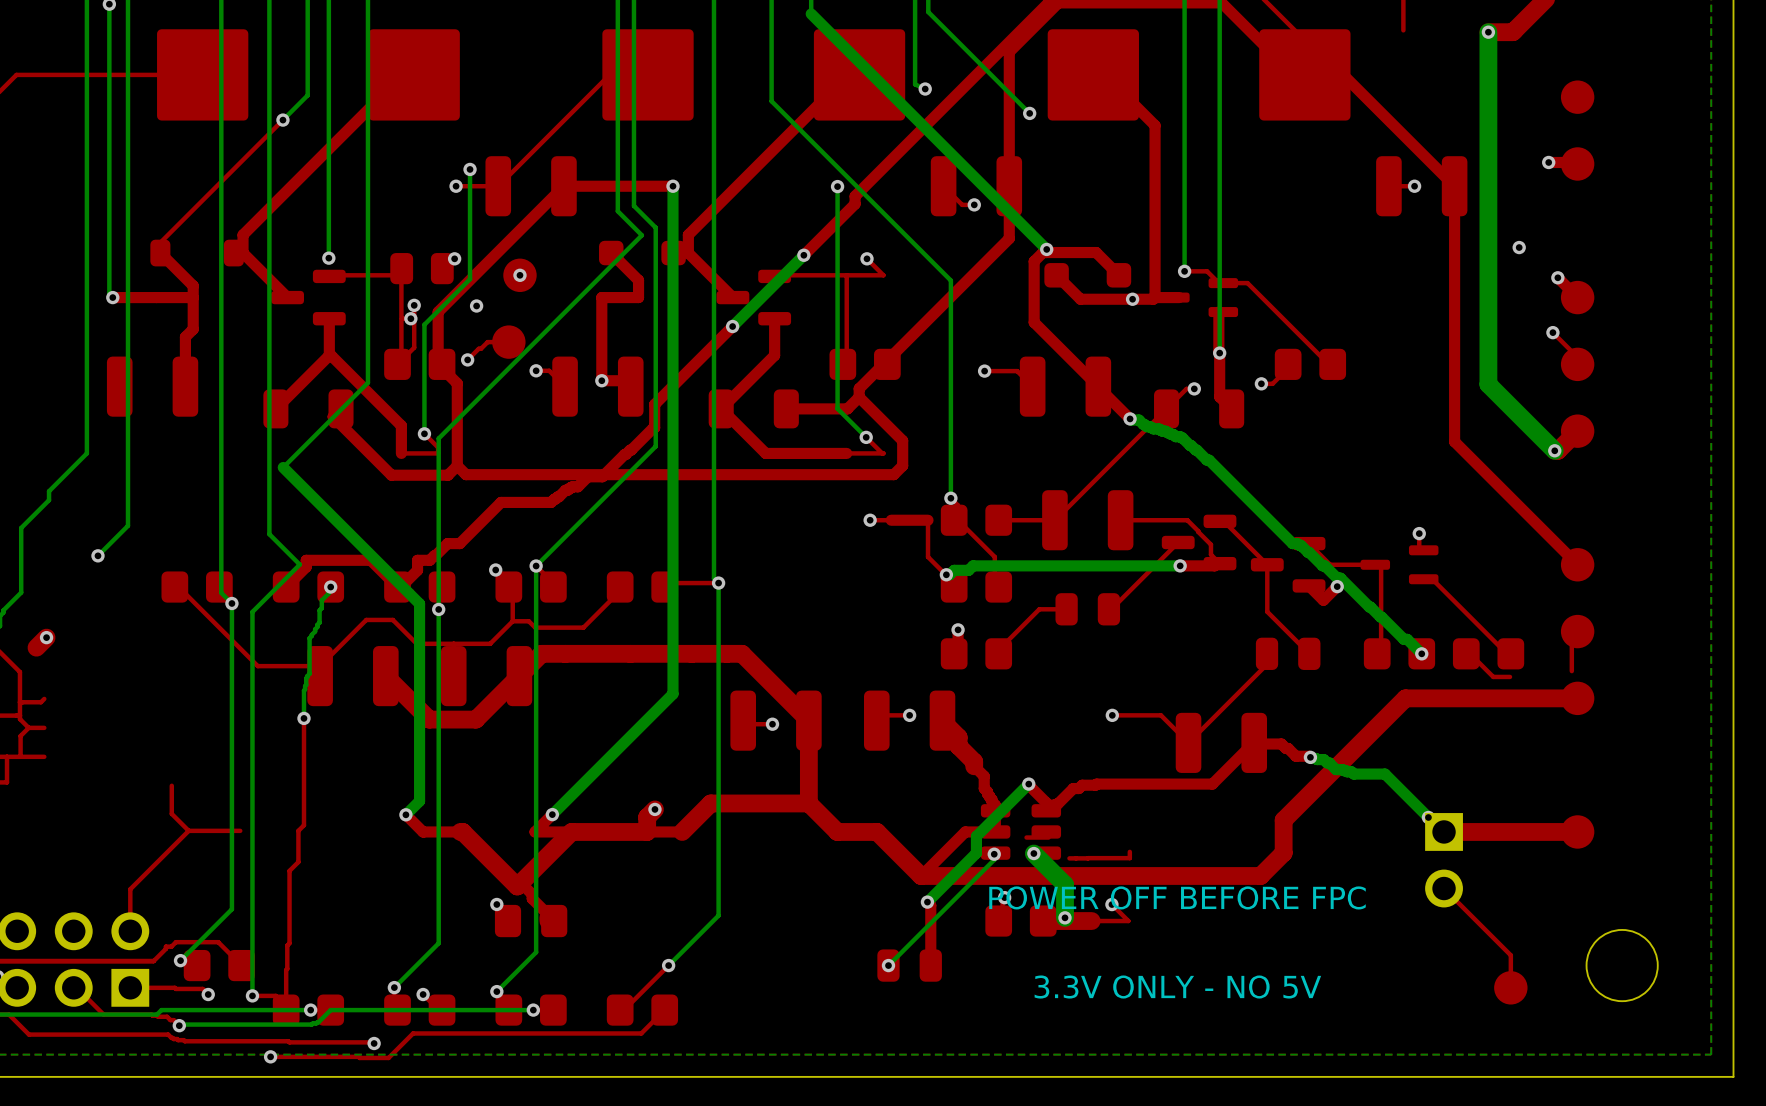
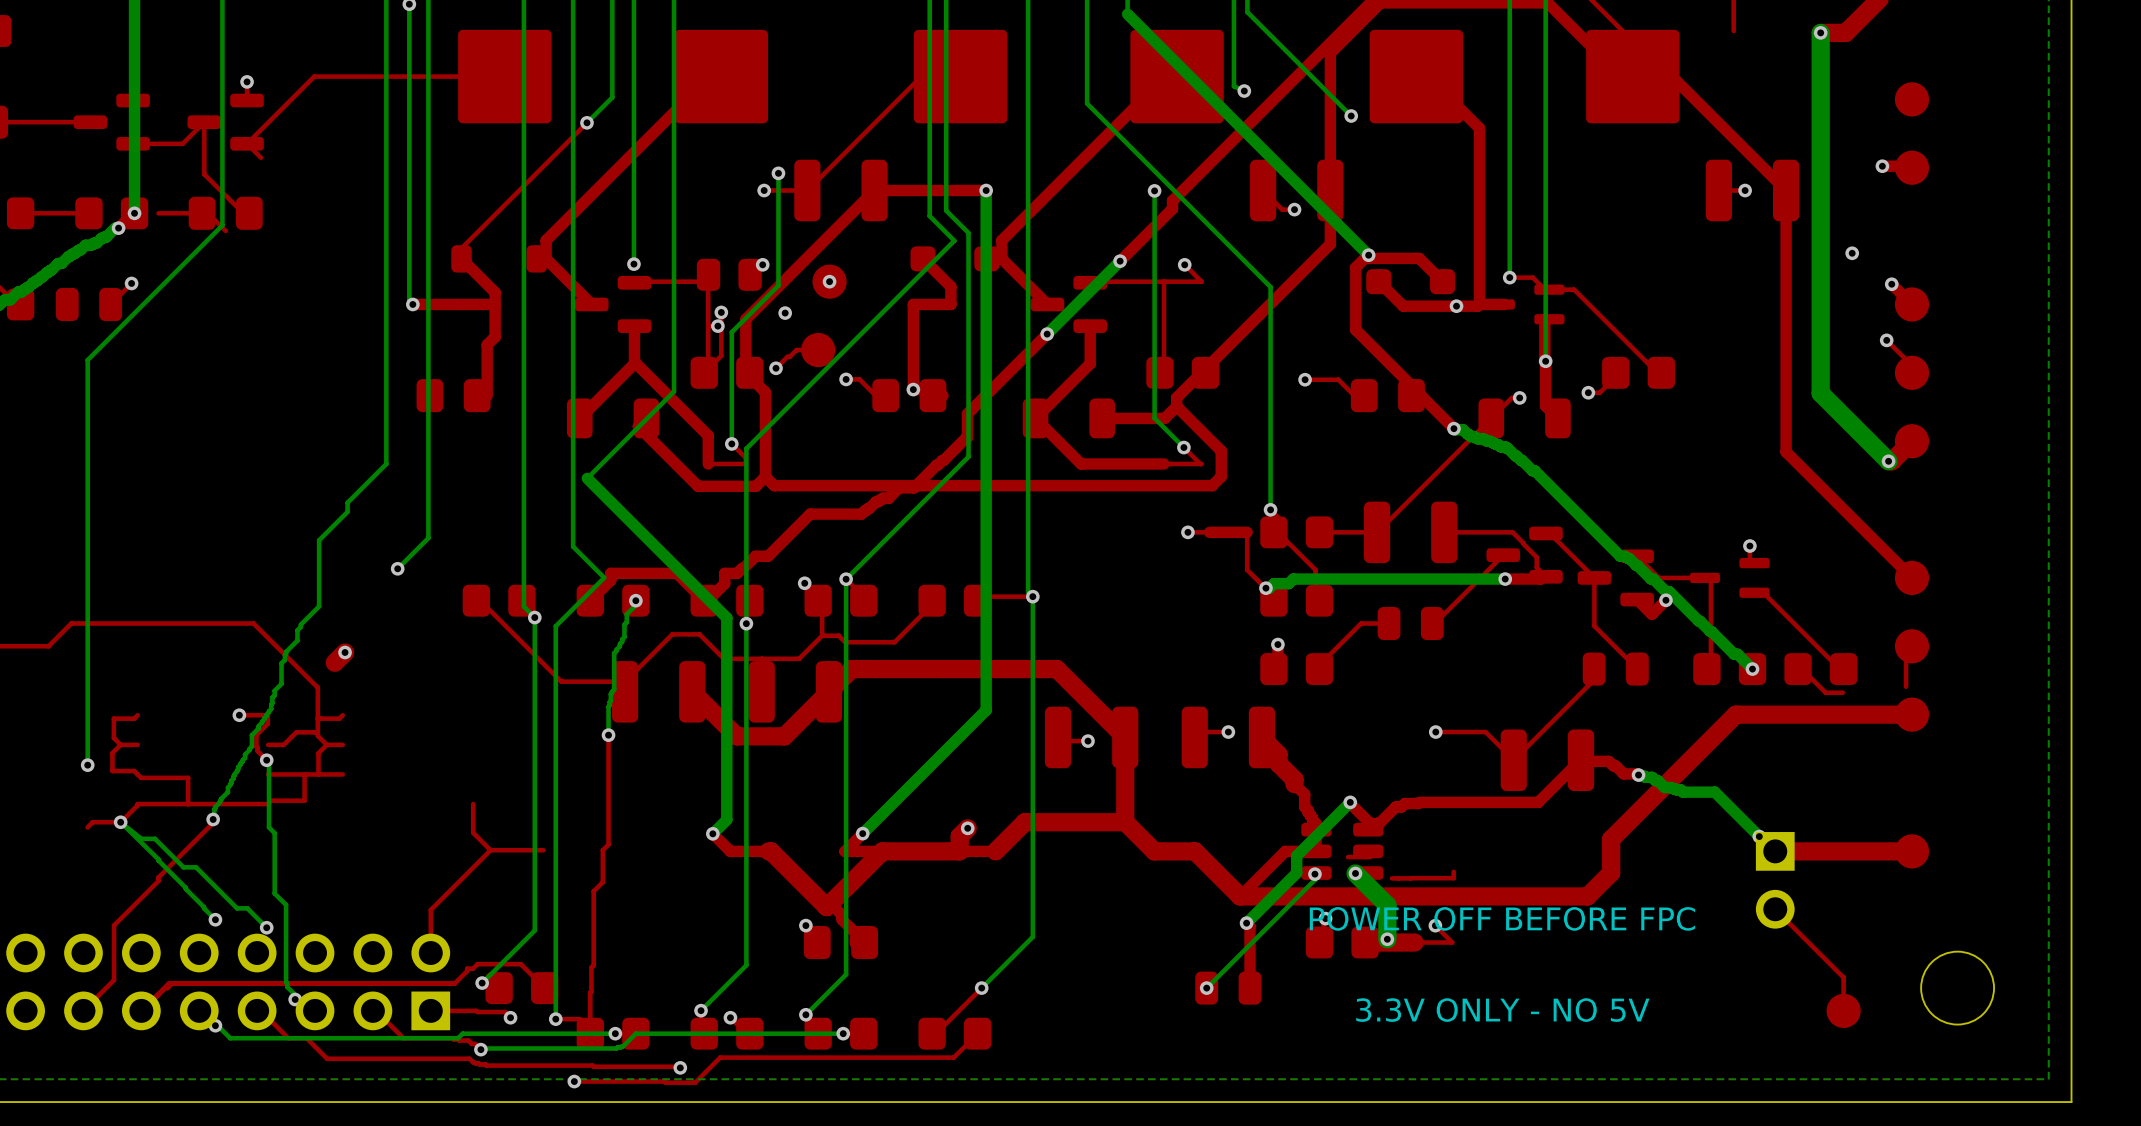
part footprint: [106, 356, 199, 417] -> [416, 379, 491, 413]
part footprint: [552, 356, 644, 417] -> [872, 379, 947, 413]
part footprint: [1019, 356, 1112, 417] -> [1350, 379, 1425, 413]

